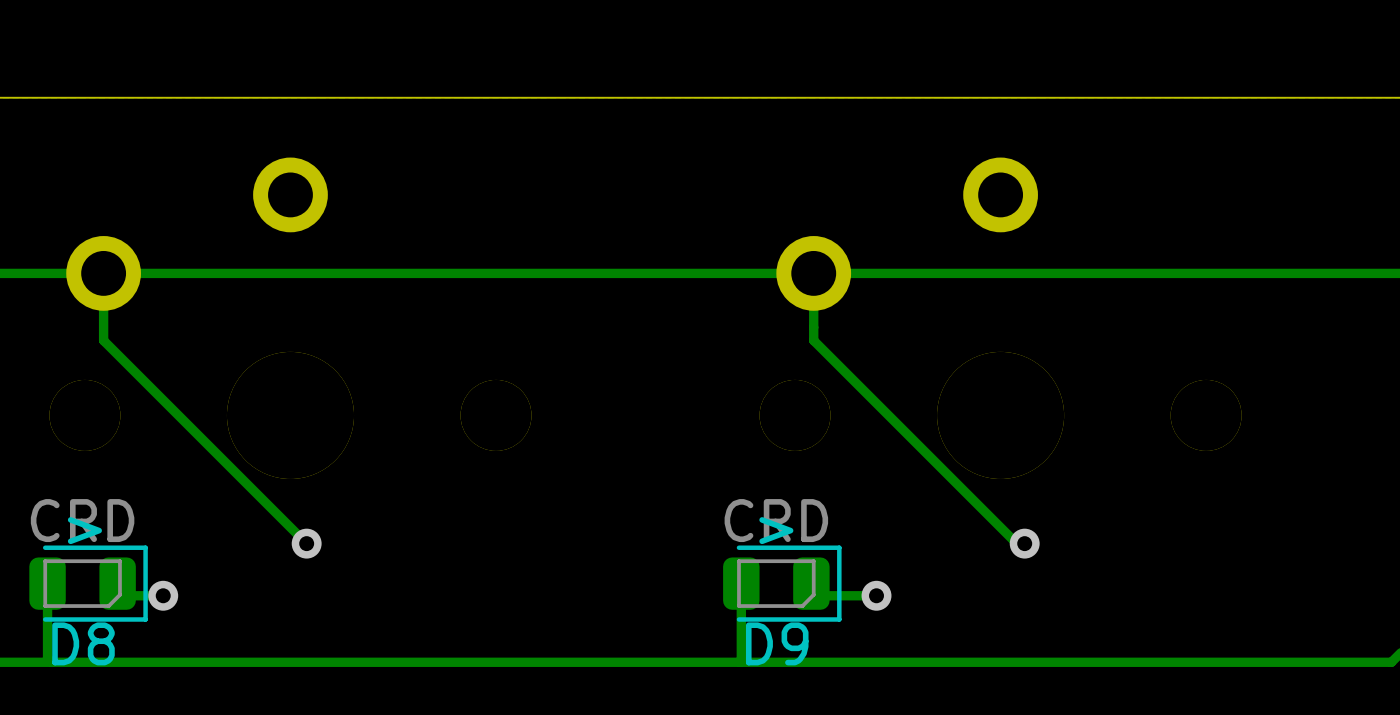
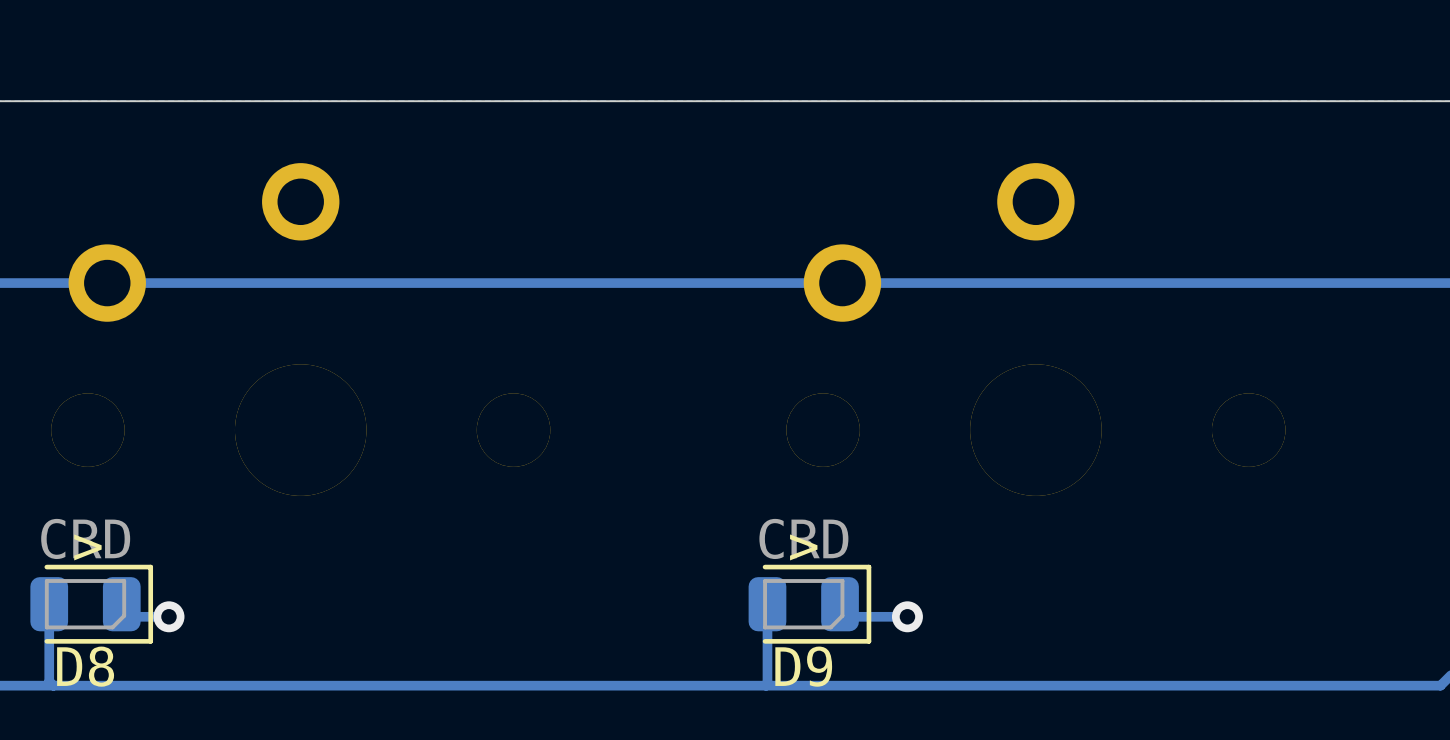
track: (103, 273) (103, 340) (306, 543) -> none
track: (813, 273) (813, 340) (1016, 543) (1024, 543) -> none
via: (306, 543) -> none
via: (1024, 543) -> none

